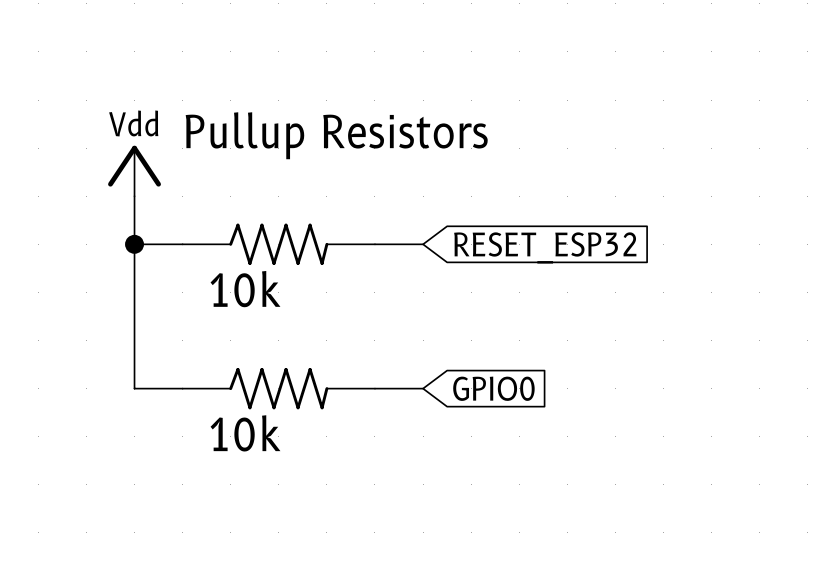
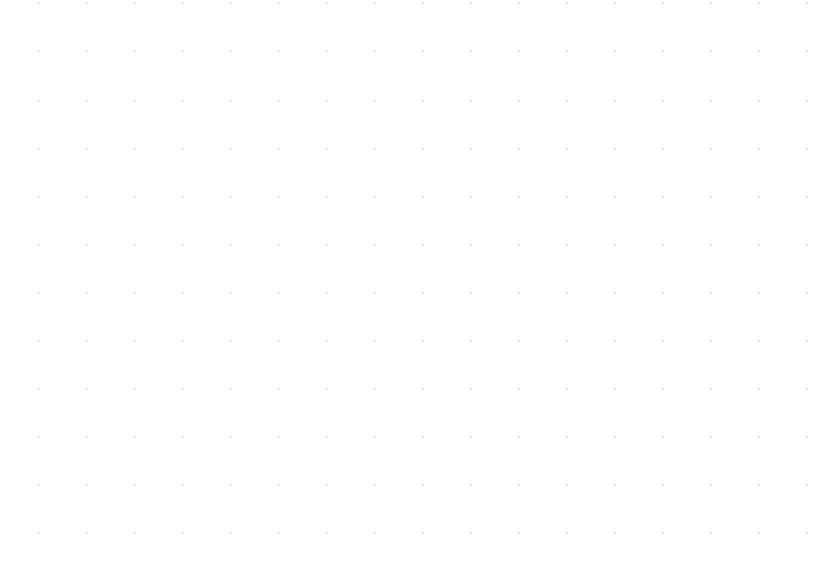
text: Pullup Resistors (336, 135) -> none
power symbol: (134, 170) -> none
wire: (134, 196) (134, 388) (182, 388) -> none
wire: (134, 244) (182, 244) -> none
junction: (134, 244) -> none
part: 10k (278, 244) -> none
wire: (374, 244) (423, 244) -> none
global label: RESET_ESP32 (545, 247) -> none
part: 10k (278, 388) -> none
wire: (374, 388) (423, 388) -> none
global label: GPIO0 (493, 388) -> none

